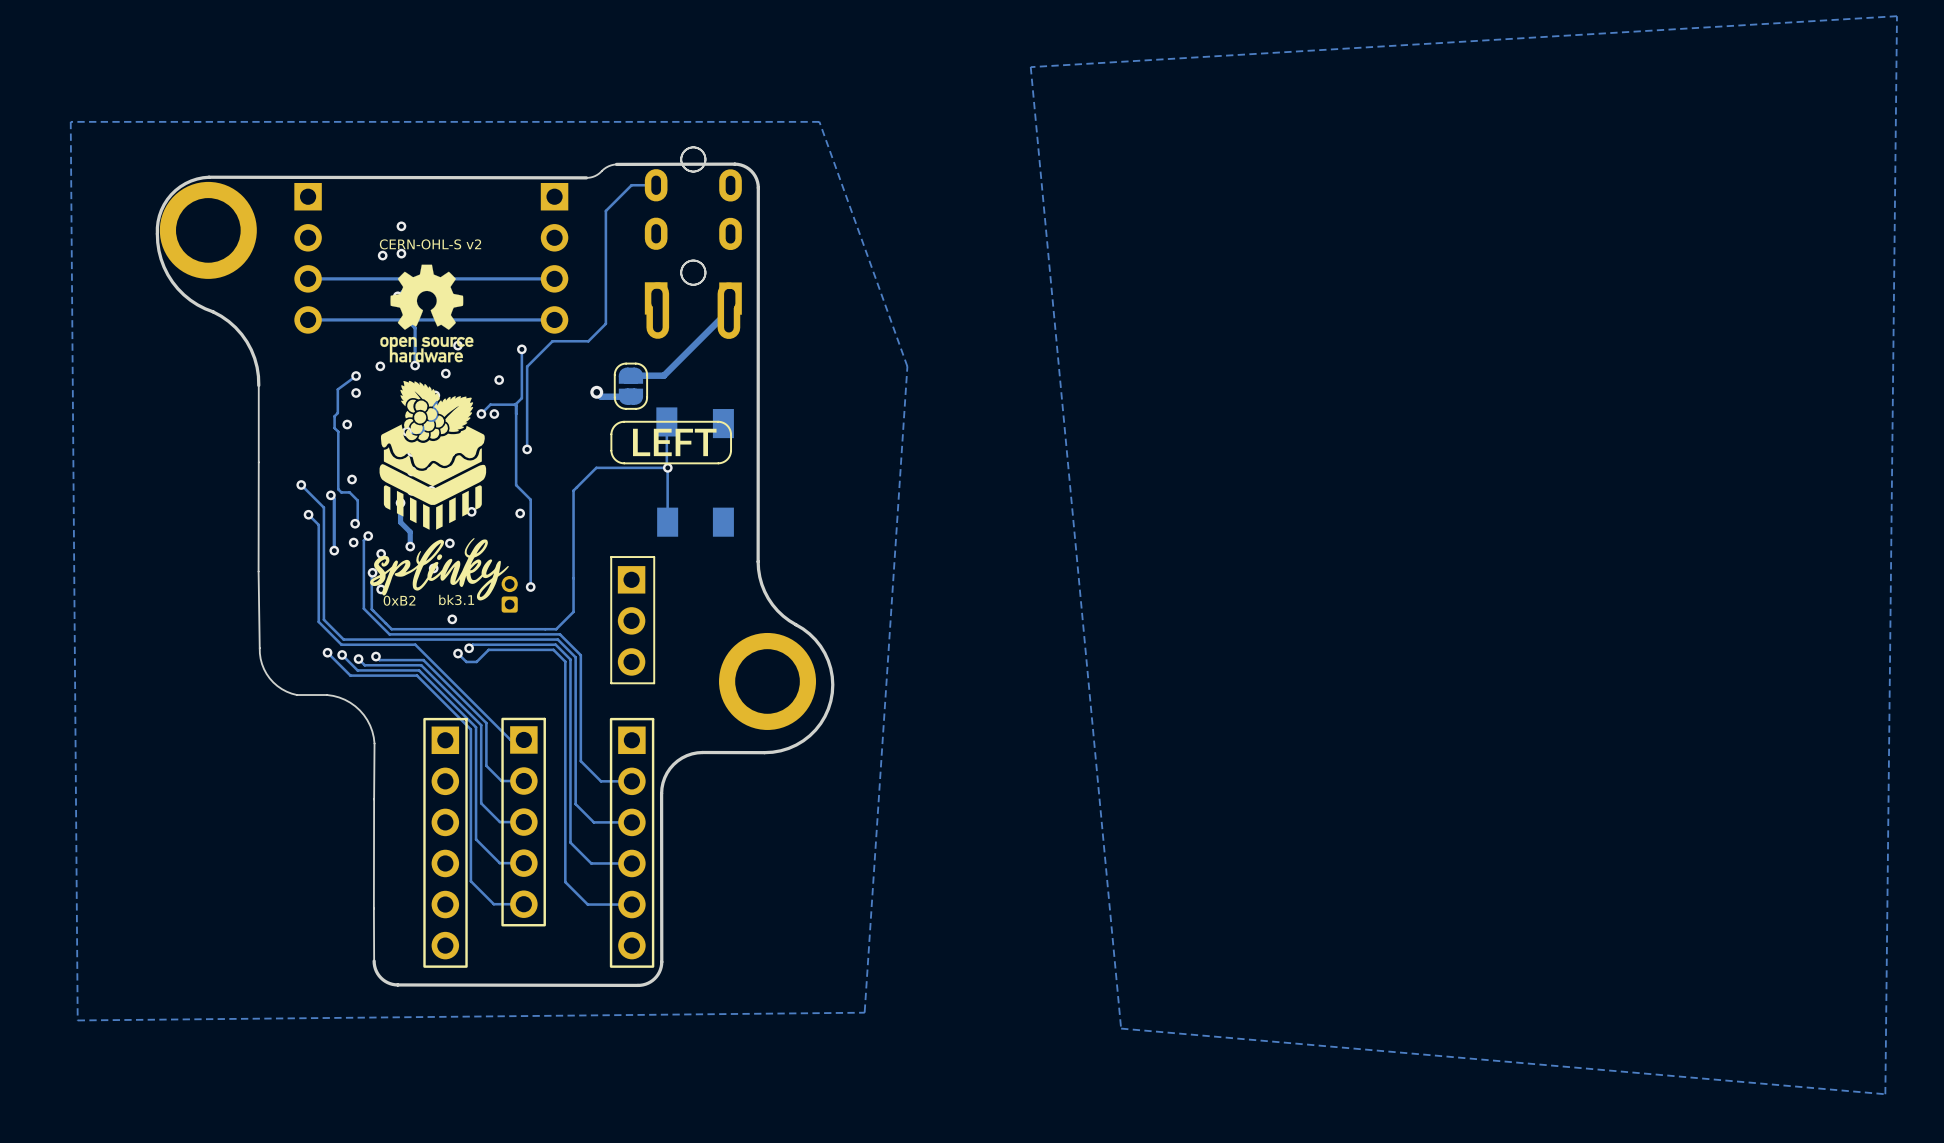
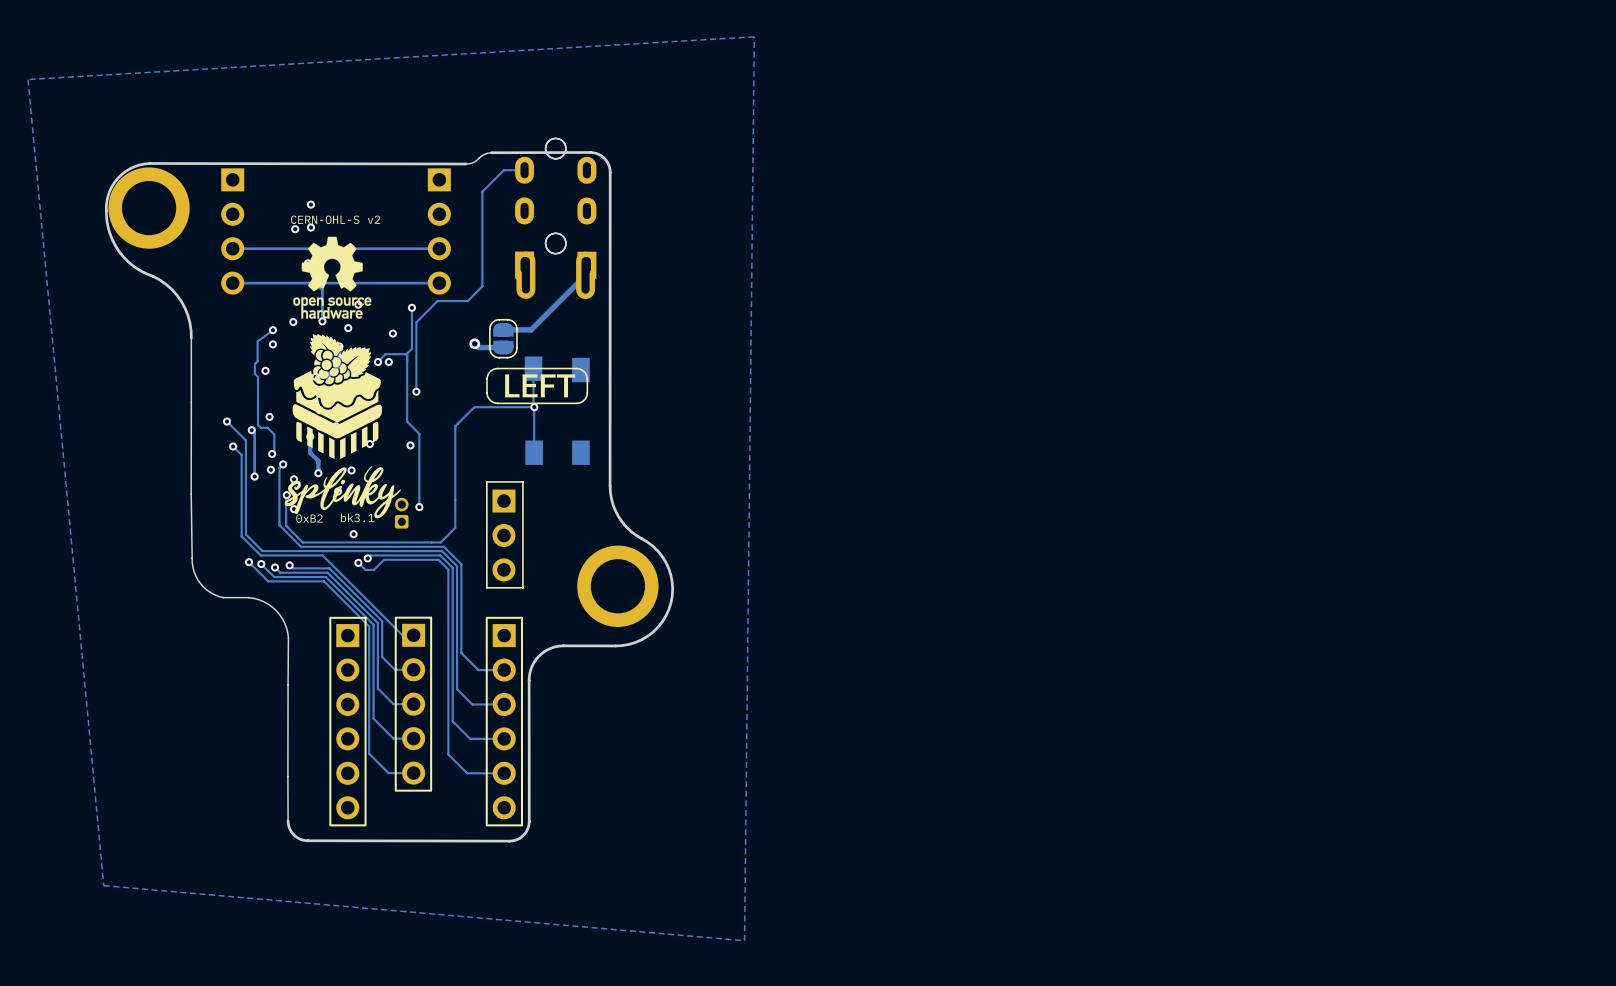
zone outline: (1896, 16) (1885, 1094) (1121, 1028) (1030, 67) (1896, 16) -> none
zone outline: (819, 121) (907, 366) (864, 1012) (77, 1020) (70, 121) (819, 121) -> (754, 36) (744, 940) (103, 885) (28, 79) (754, 36)

